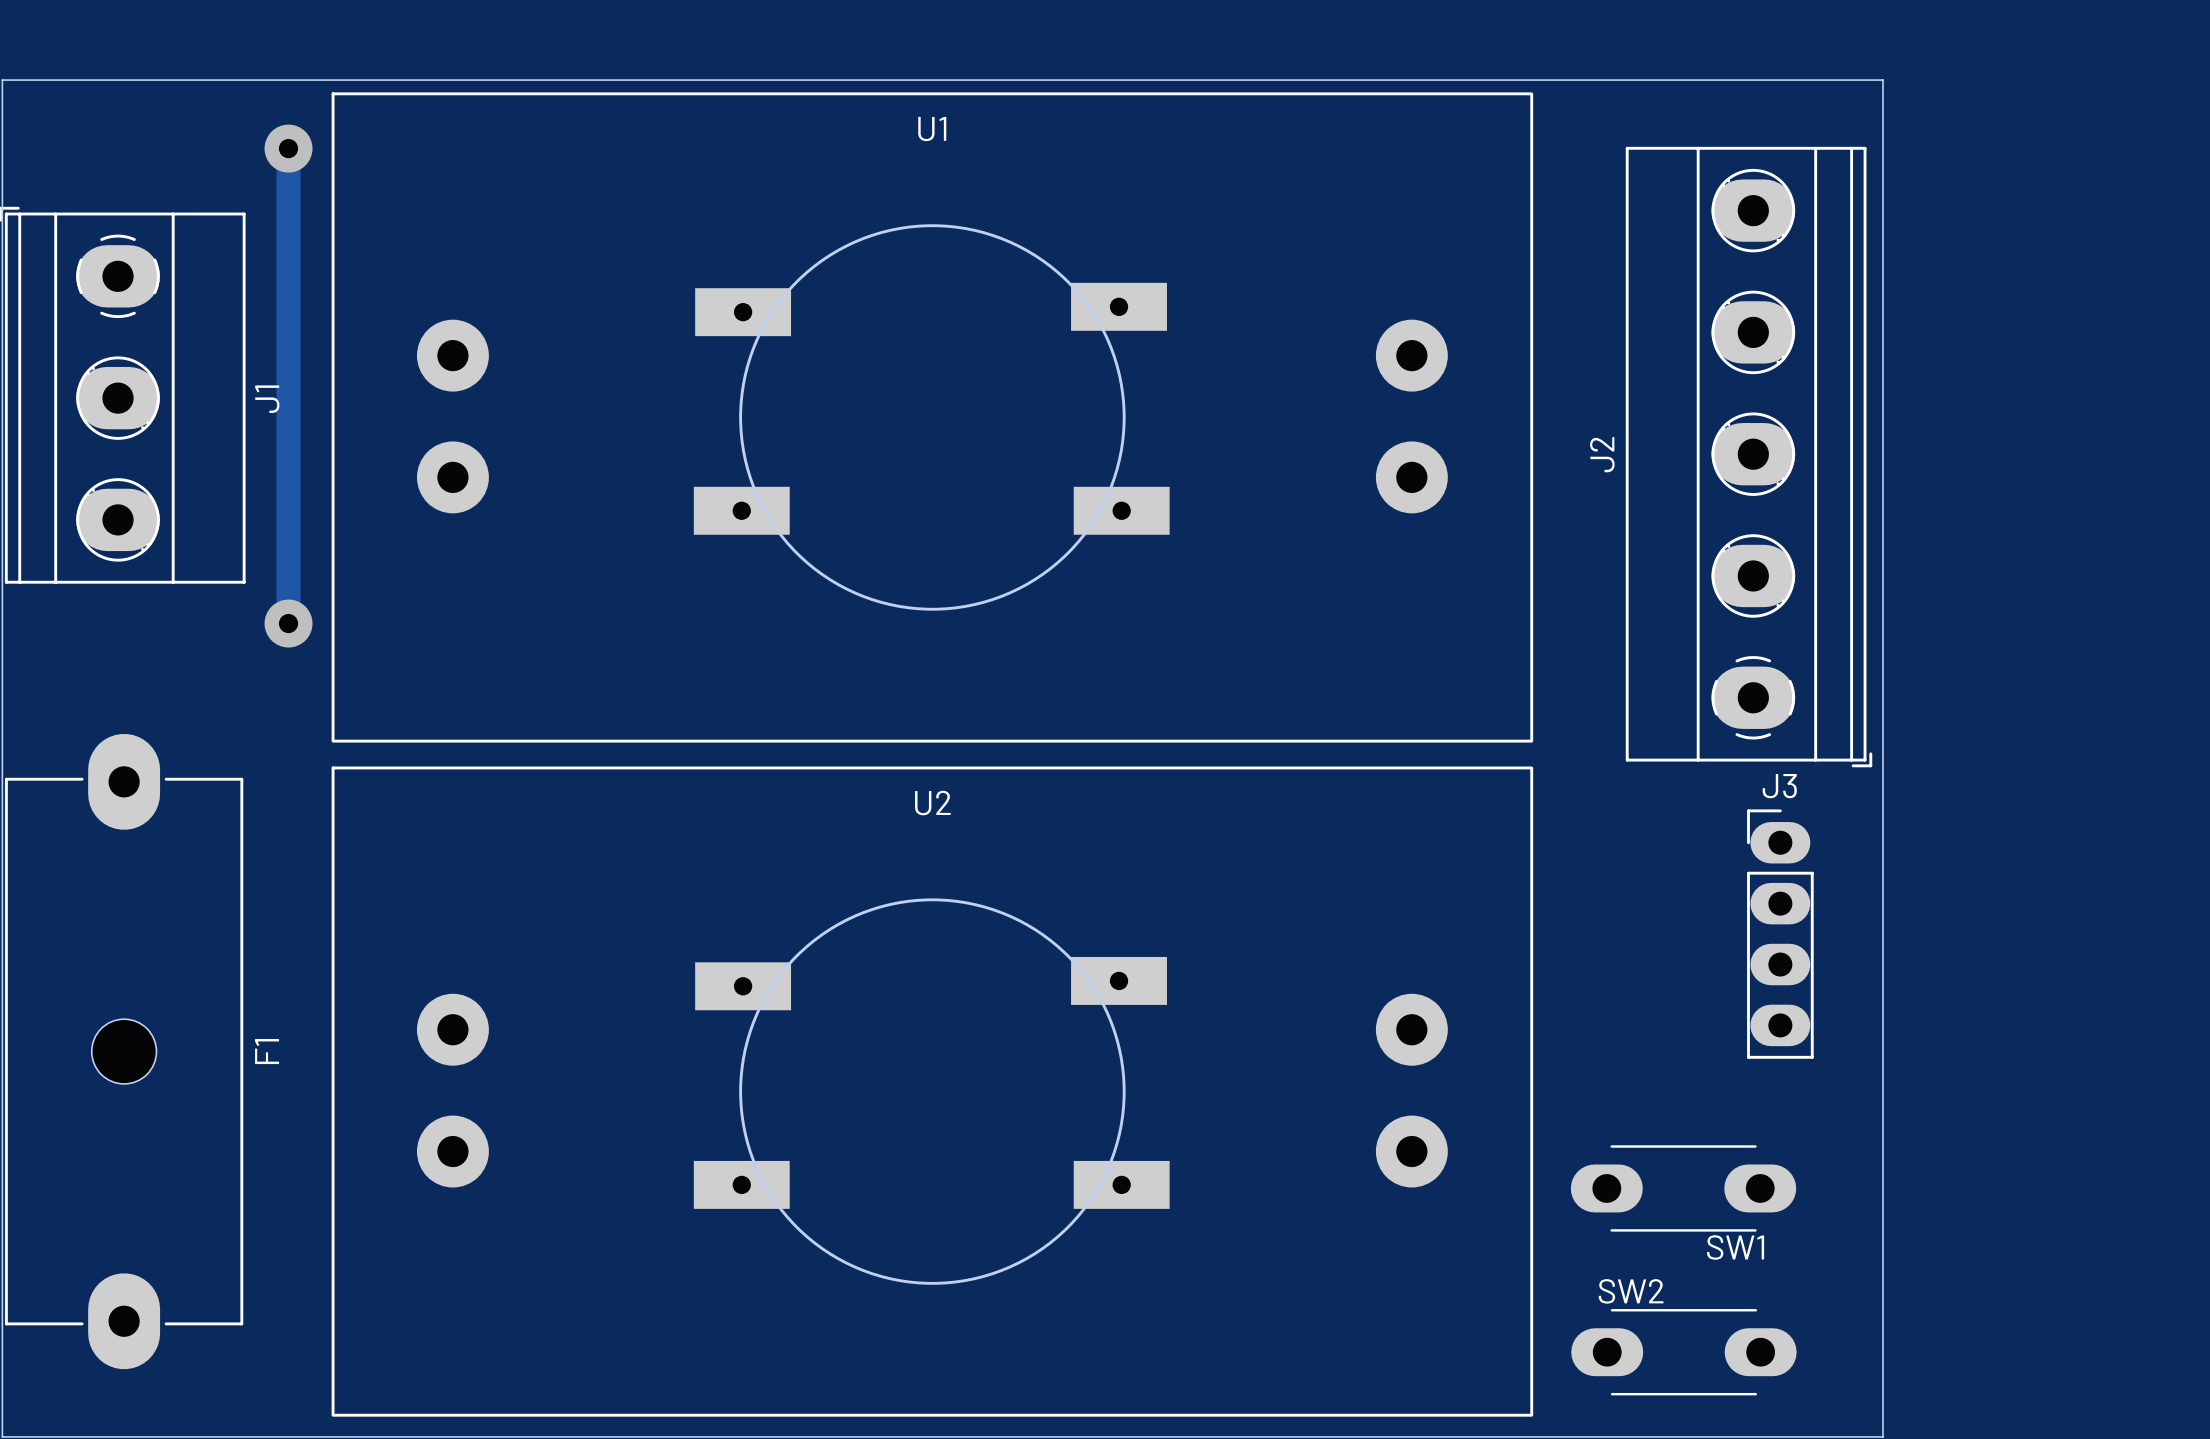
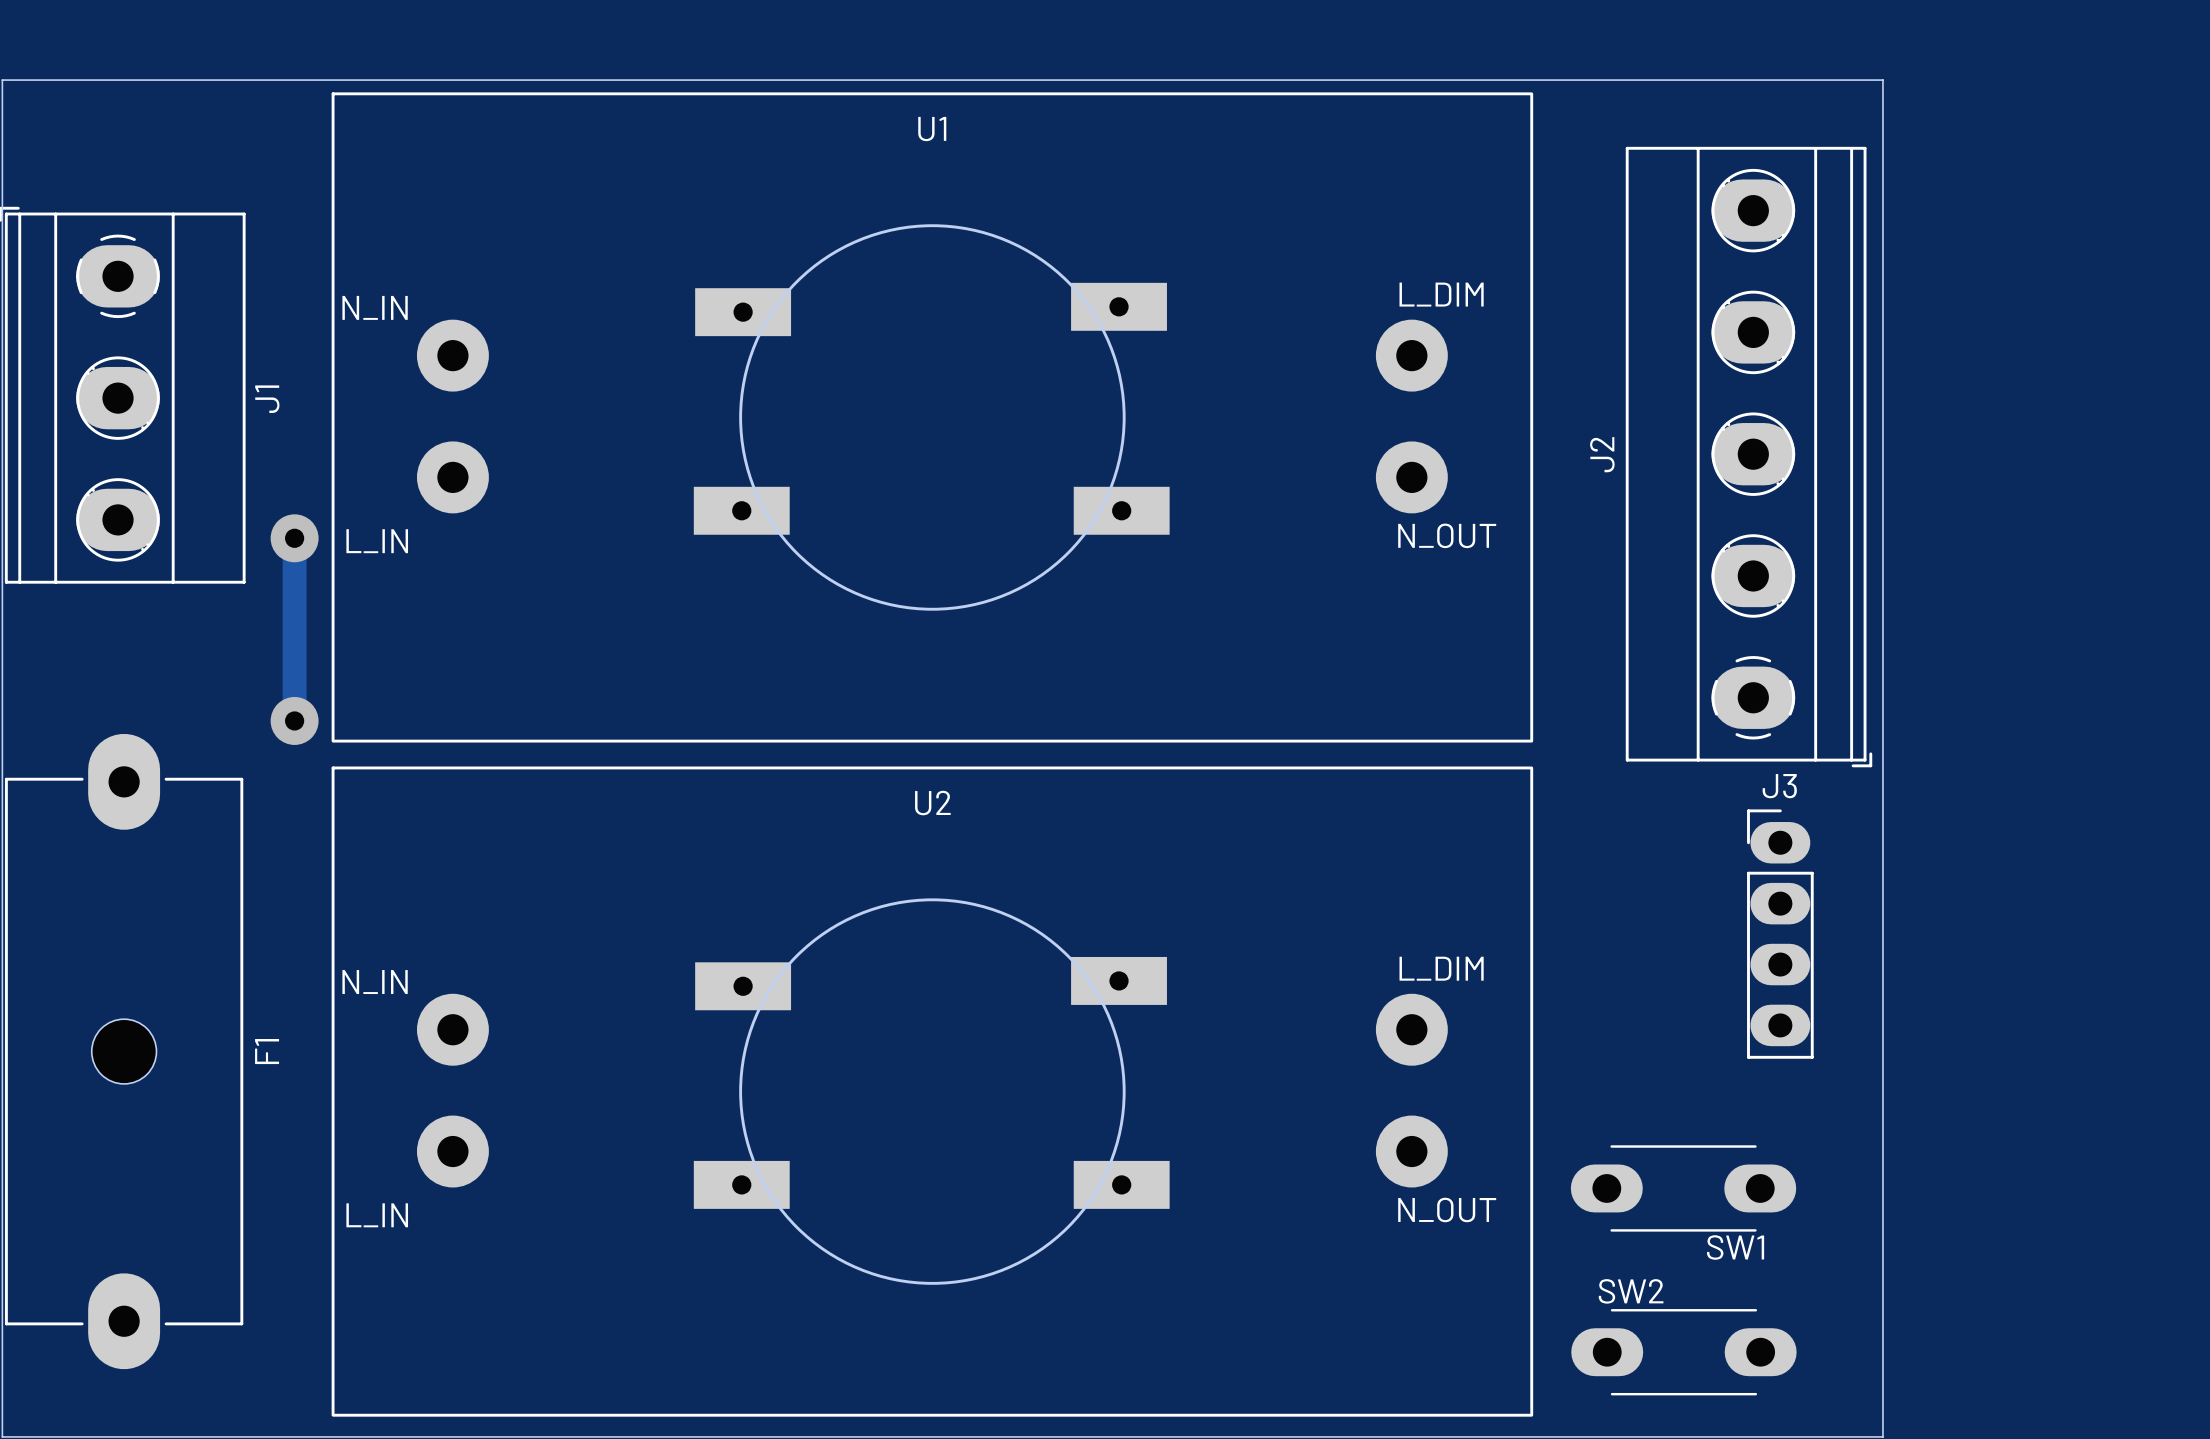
U1 footprint: [331, 92, 1534, 743] -> [331, 92, 1534, 743]
track: (288, 148) (288, 623) -> none
via: (288, 148) -> none
track: none -> (294, 538) (294, 720)
via: none -> (294, 538)
via: (288, 623) -> none
via: none -> (294, 720)
U2 footprint: [331, 766, 1534, 1417] -> [331, 766, 1534, 1417]

